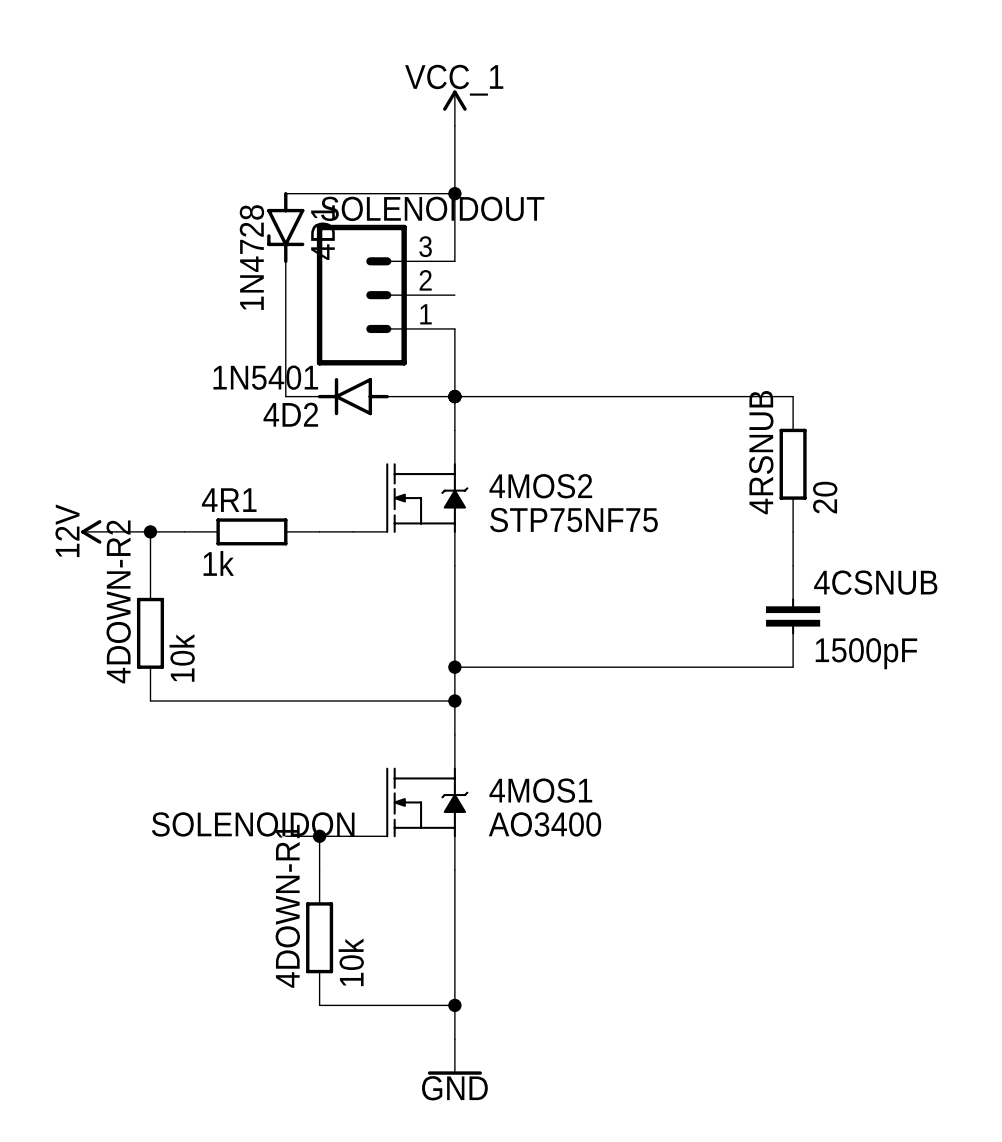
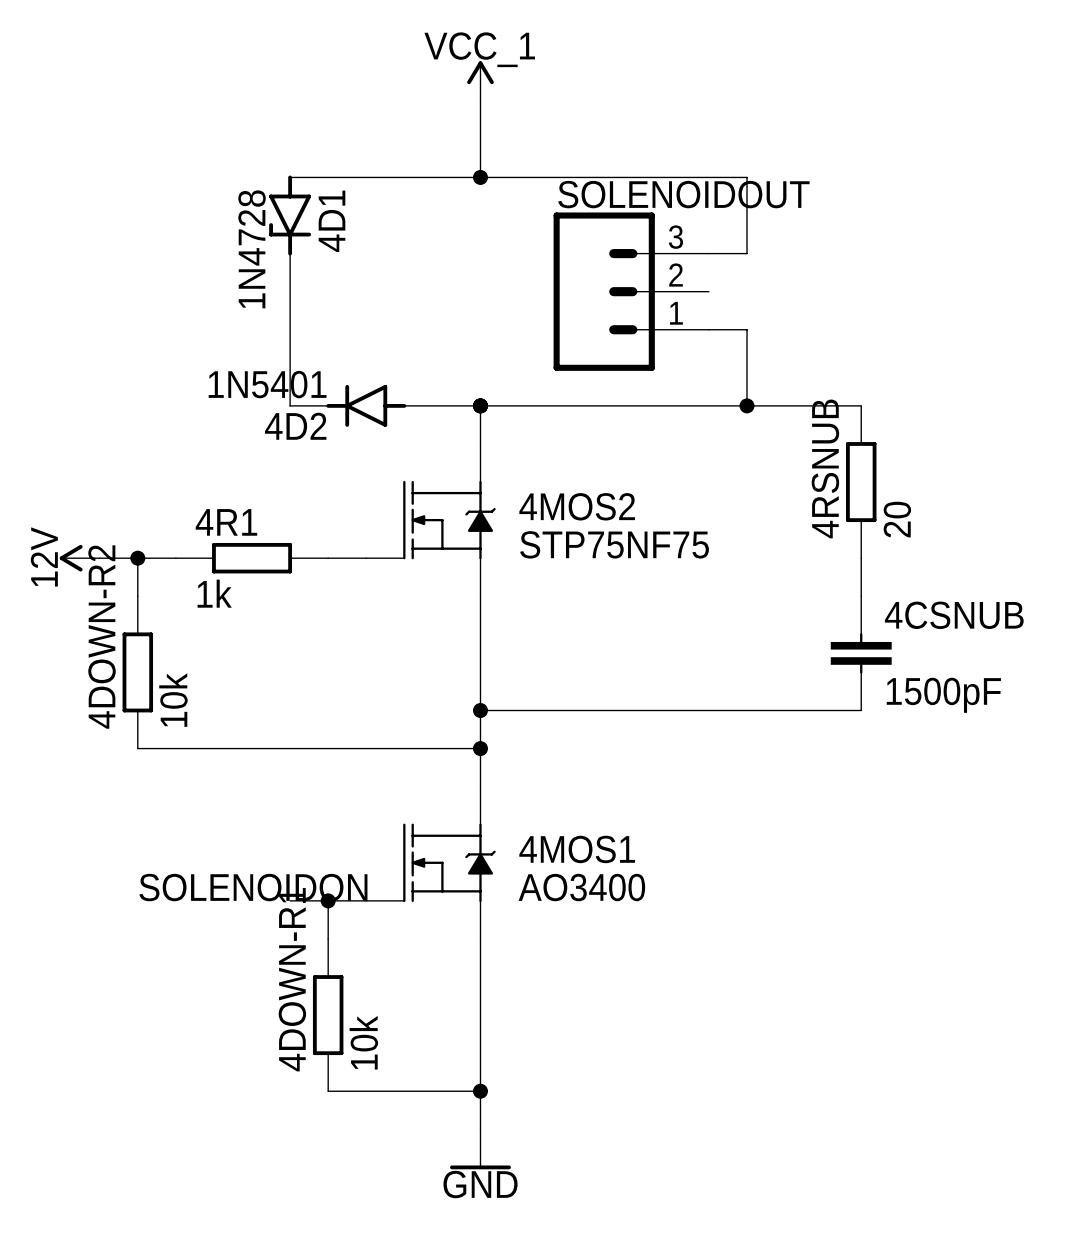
wire: (454, 193) (454, 261) -> (480, 177) (747, 177) (747, 253) (708, 253)
SOLENOIDOUT position: (385, 295) -> (631, 291)
wire: (454, 328) (454, 396) -> none
wire: none -> (708, 329) (747, 329) (747, 405)
junction: none -> (747, 405)

